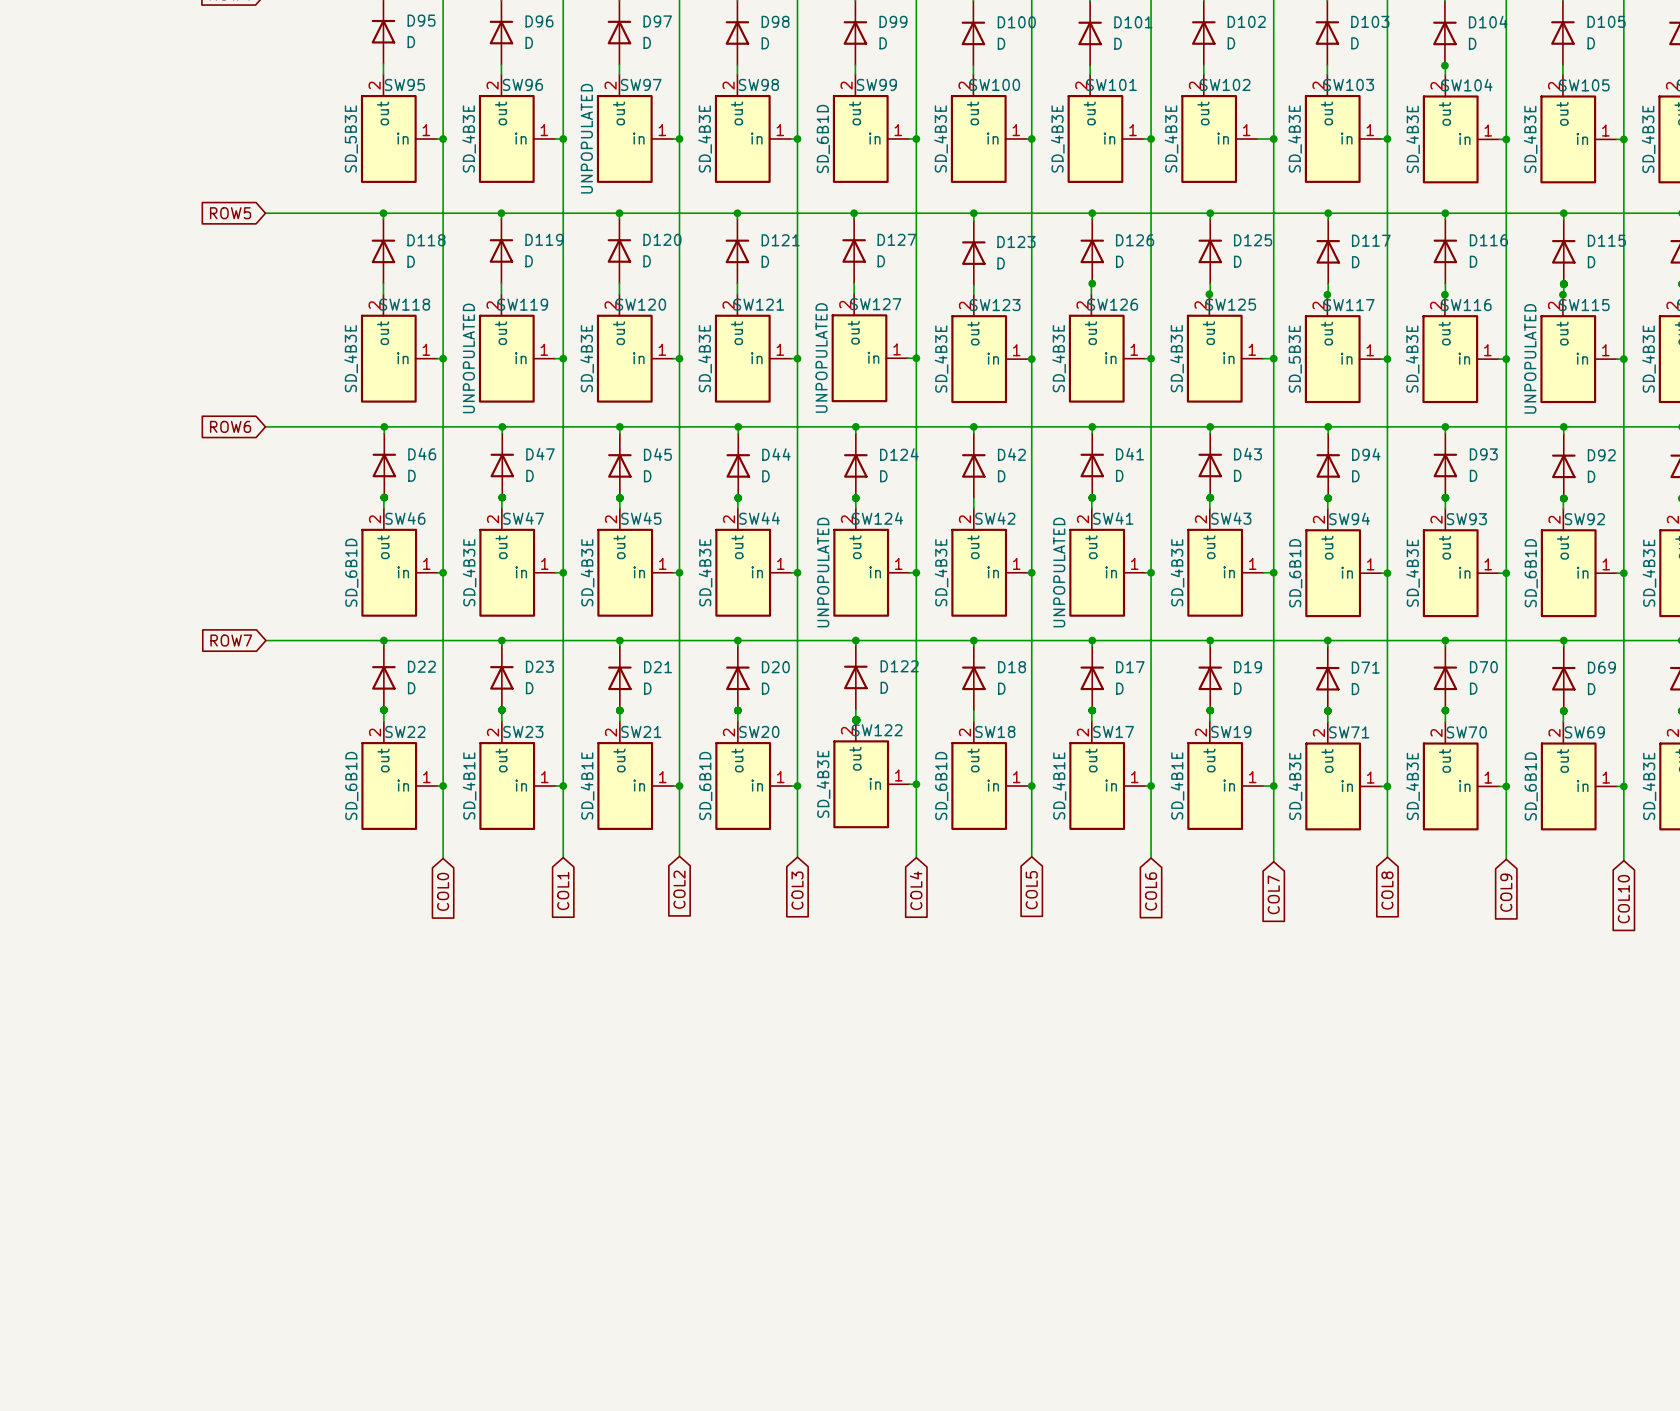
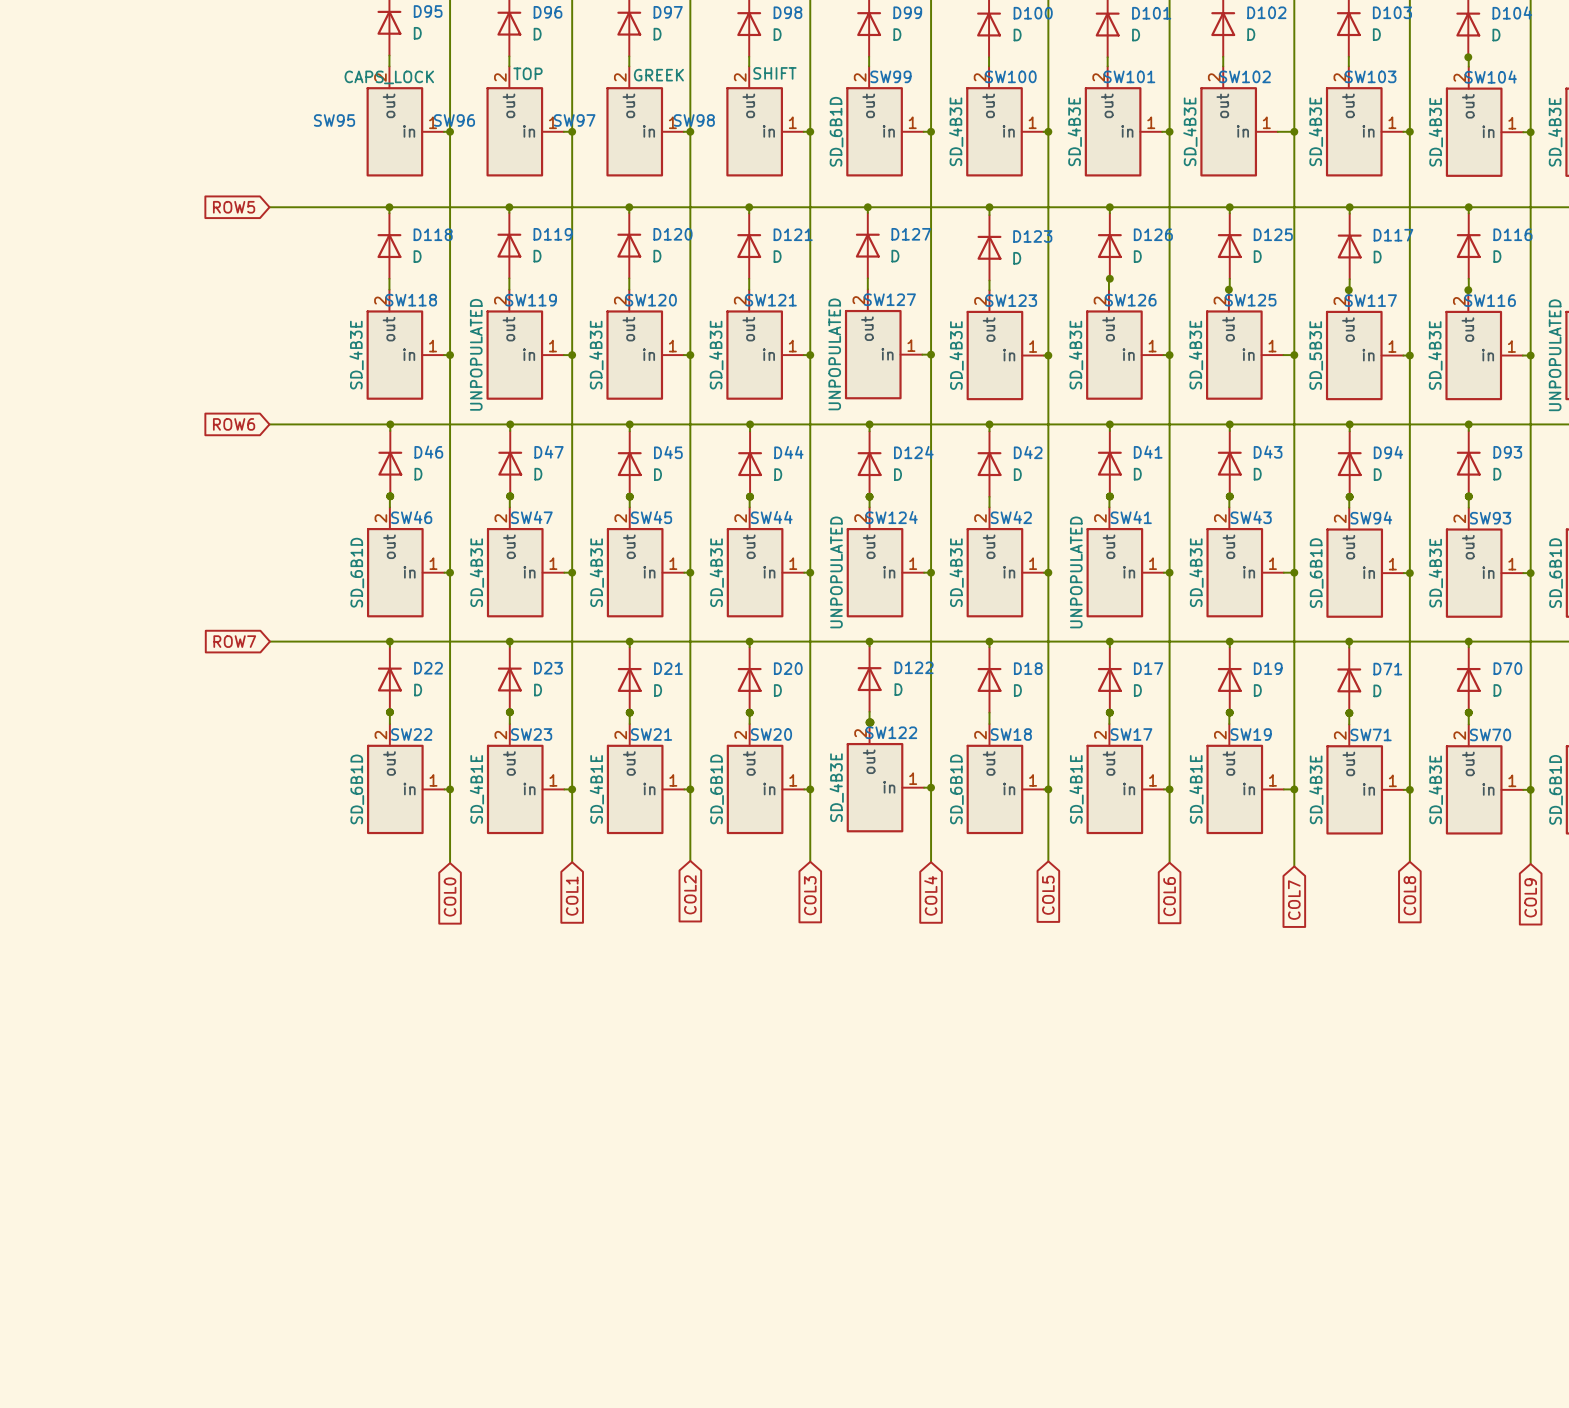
SW95 name position: SW95 (404, 84) -> SW95 (334, 120)
SW96 name position: SW96 (522, 84) -> SW96 (454, 120)
SW97 name position: SW97 (641, 84) -> SW97 (574, 120)
SW98 name position: SW98 (758, 84) -> SW98 (694, 120)
SW95 value: SD_5B3E (351, 138) -> CAPS_LOCK (389, 77)
SW96 value: SD_4B3E (469, 138) -> TOP (527, 73)
SW97 value: UNPOPULATED (586, 138) -> GREEK (658, 75)
SW98 value: SD_4B3E (705, 138) -> SHIFT (774, 73)

